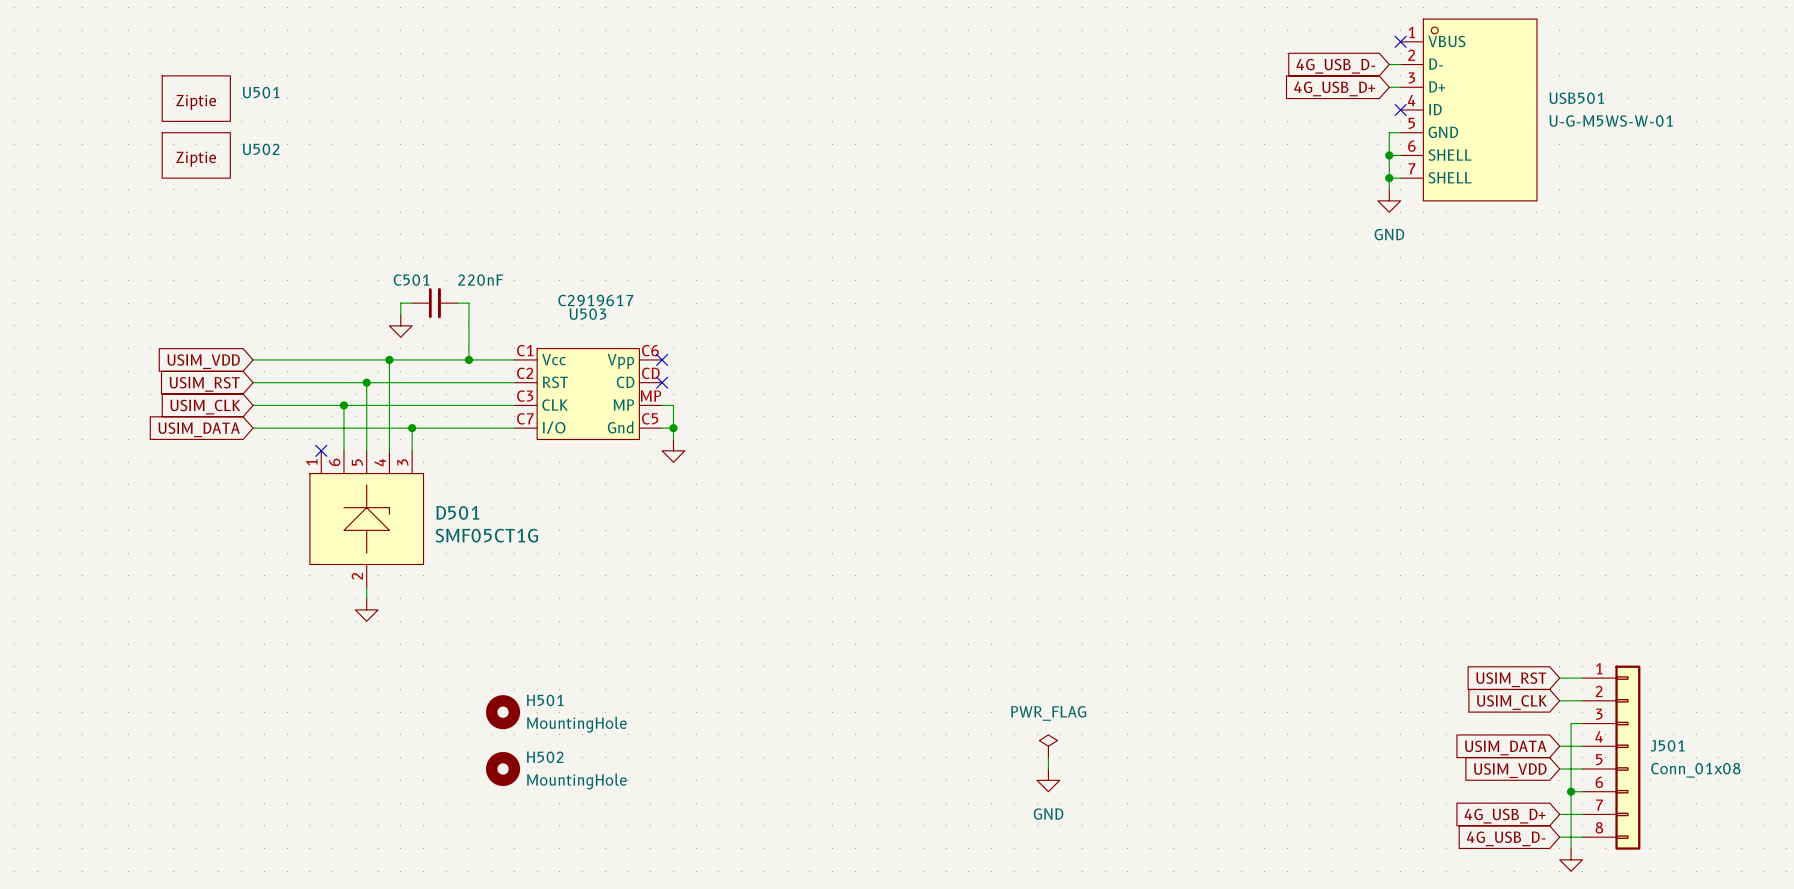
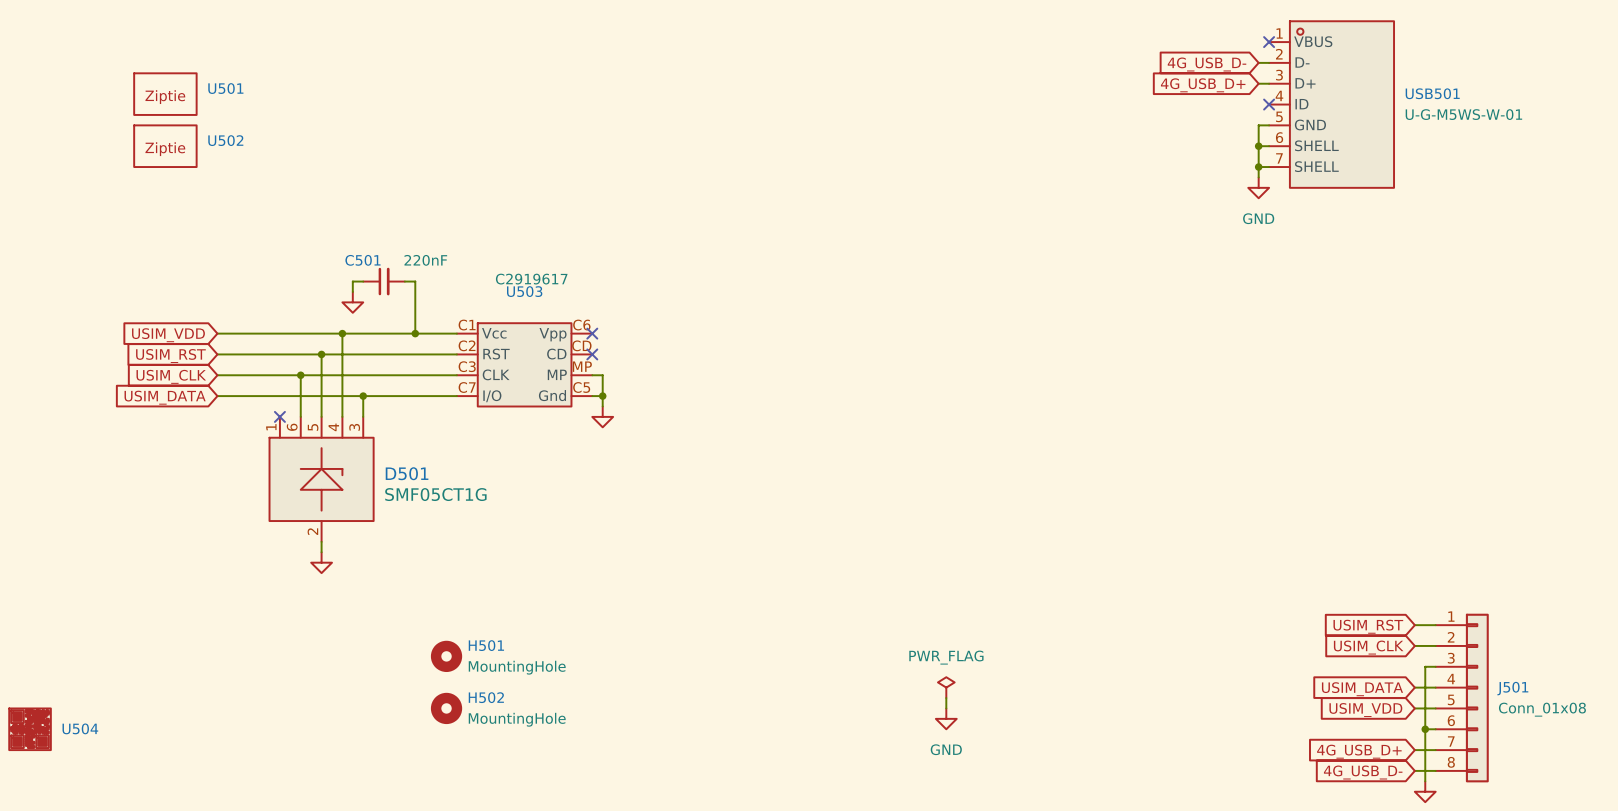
U504: none -> (30, 729)

